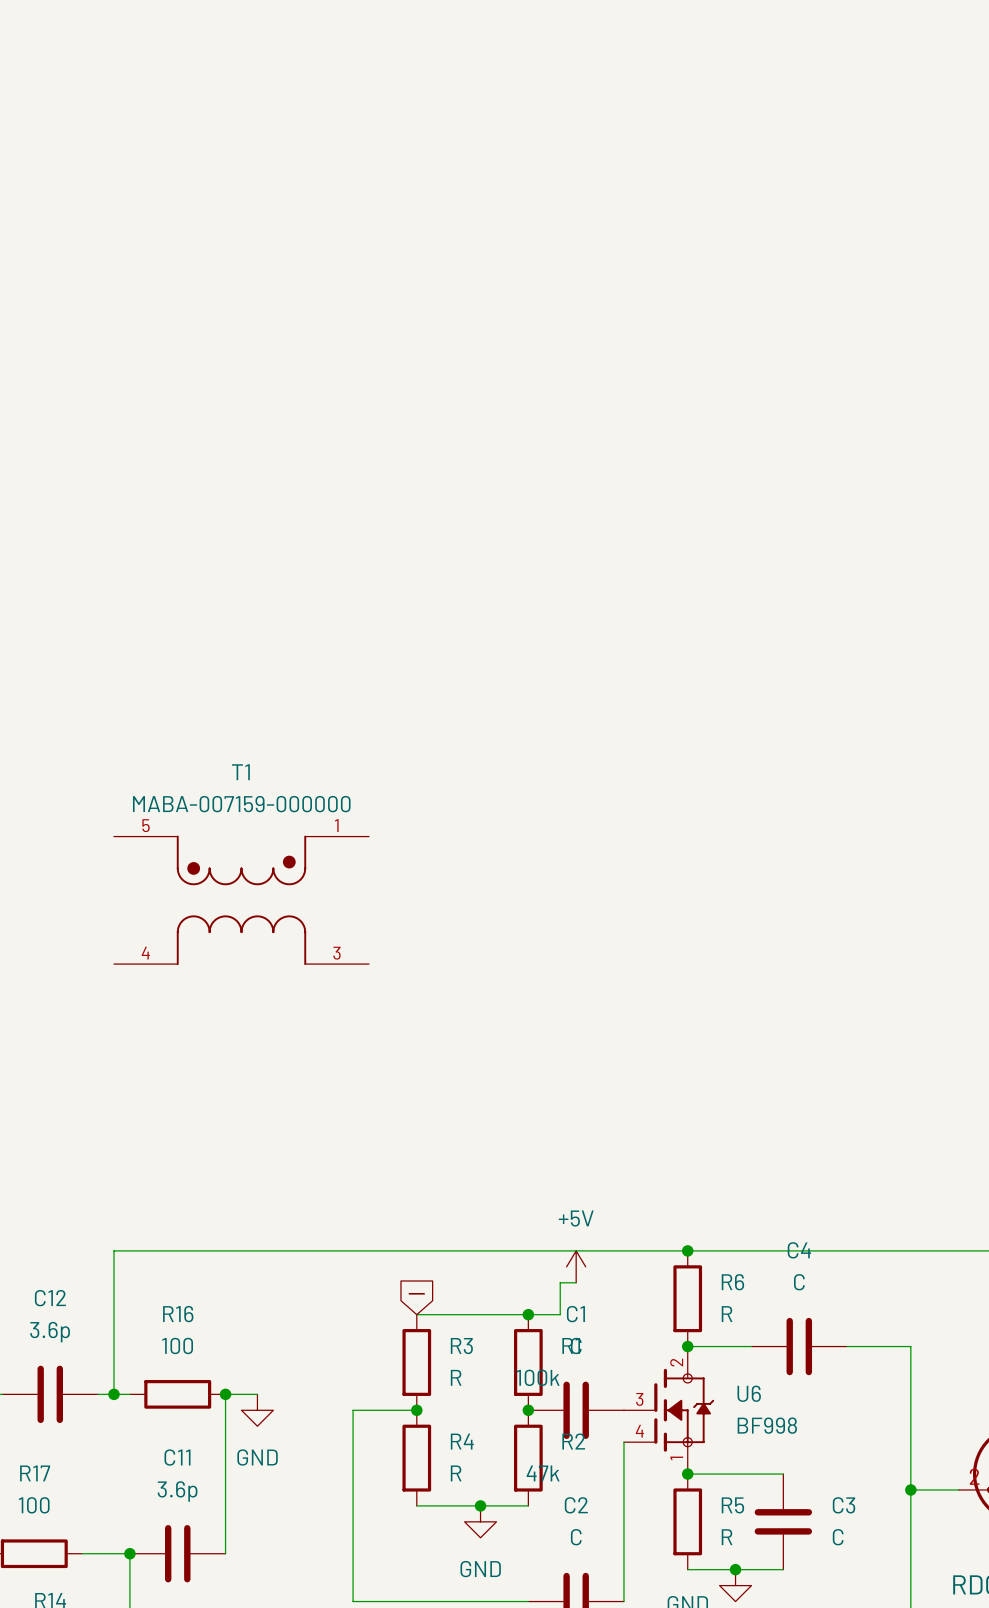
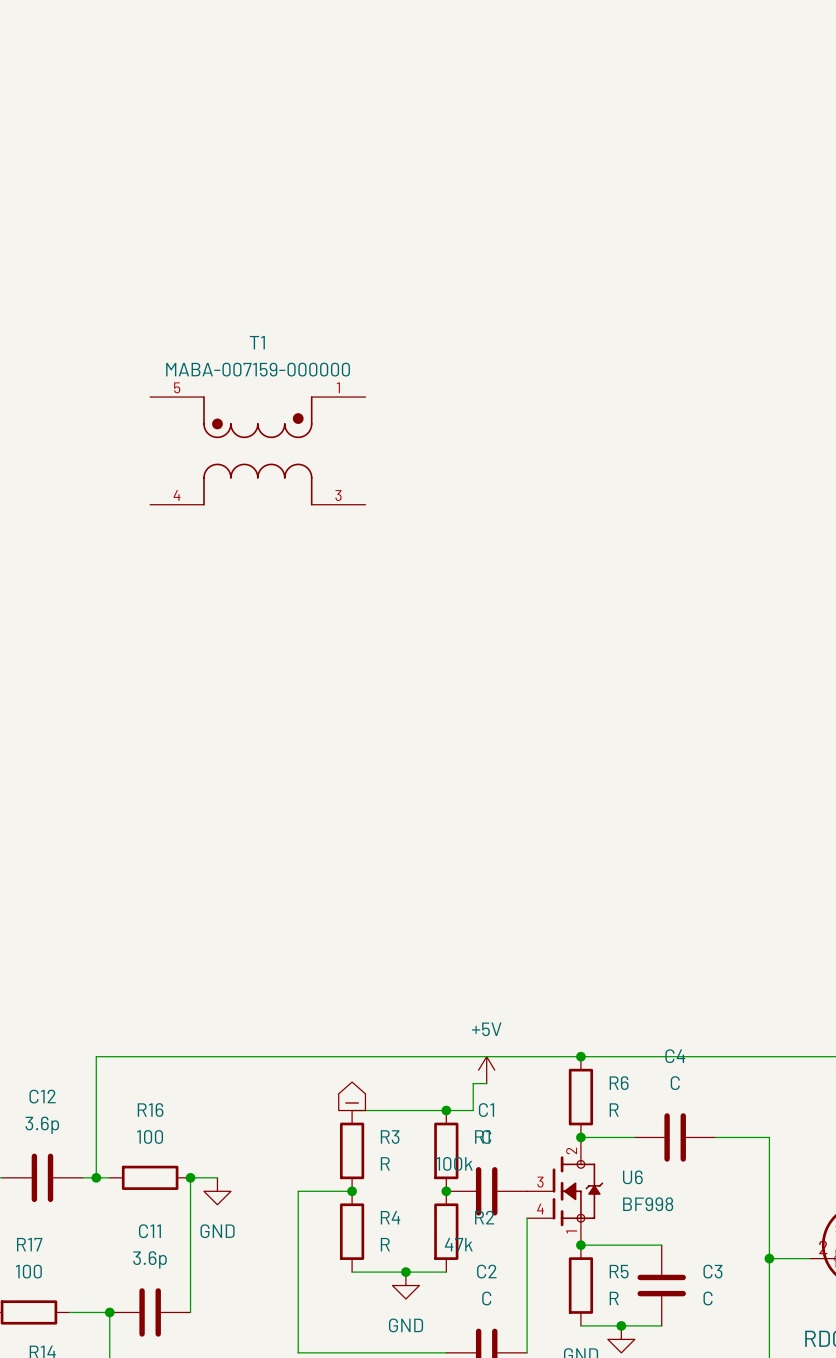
T1 position: (241, 900) -> (257, 450)
global label shape: input (416, 1293) -> output (352, 1102)

